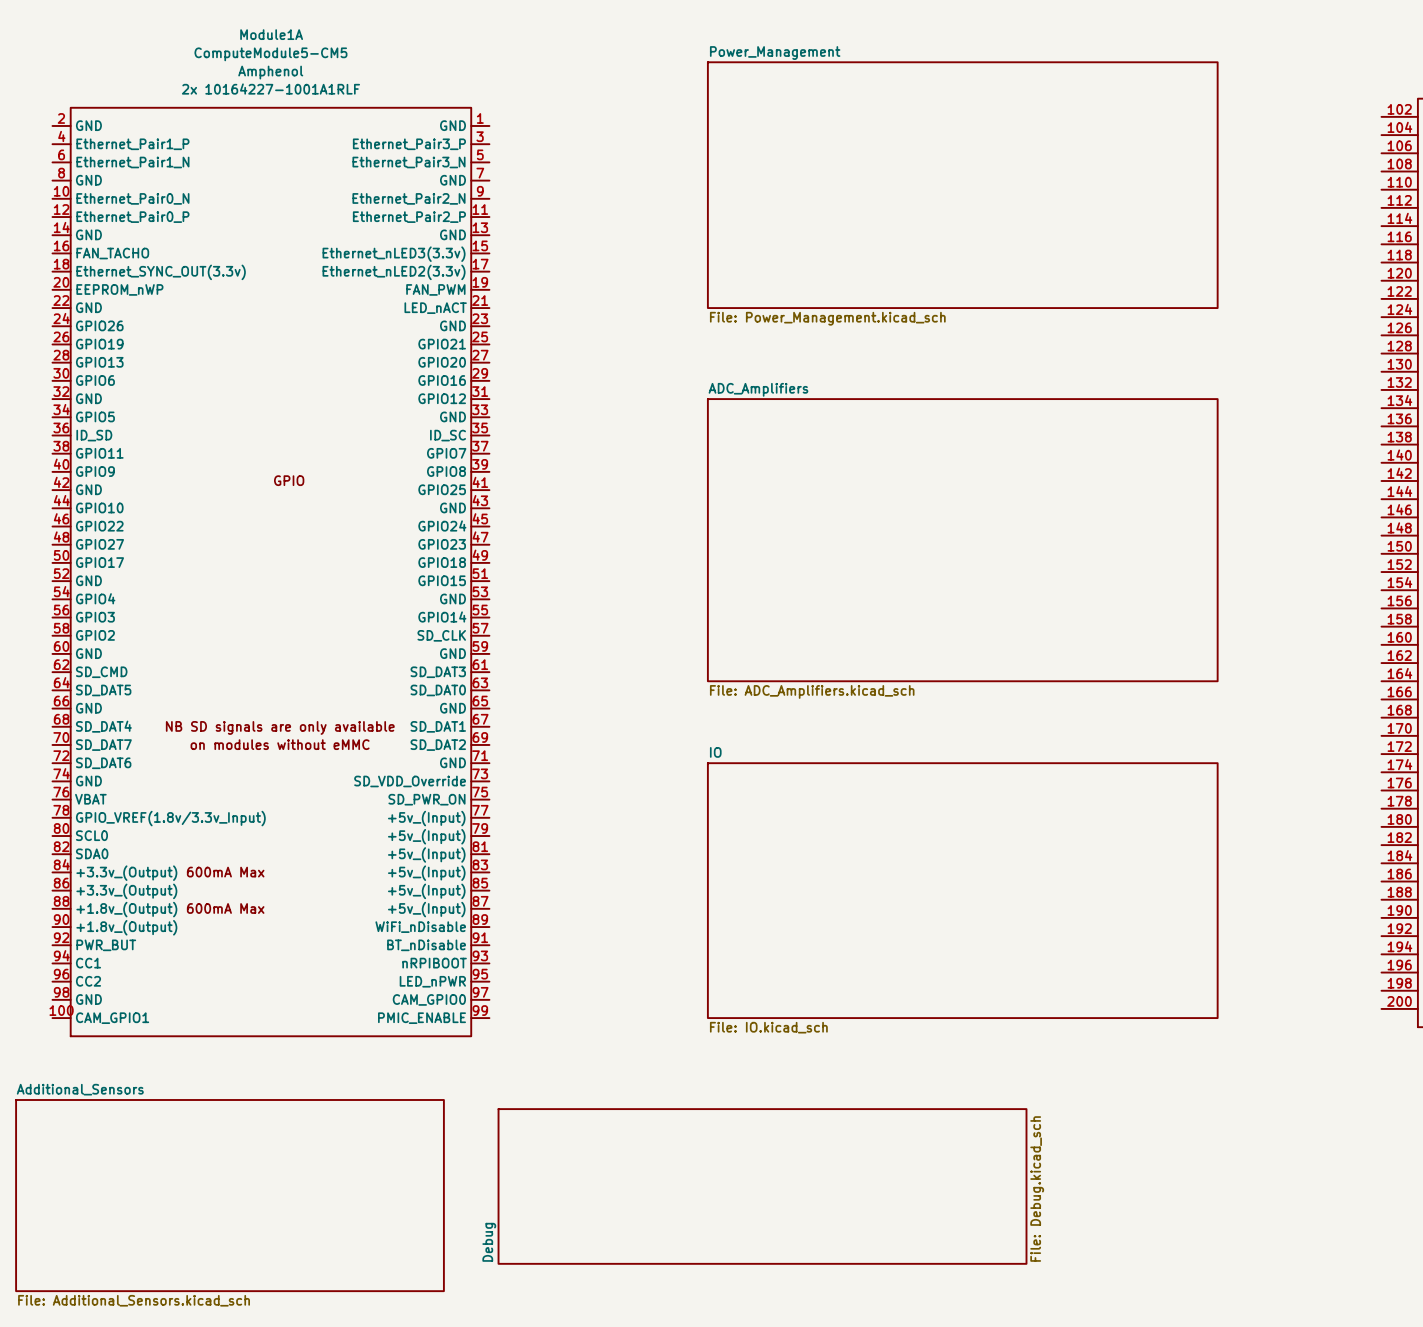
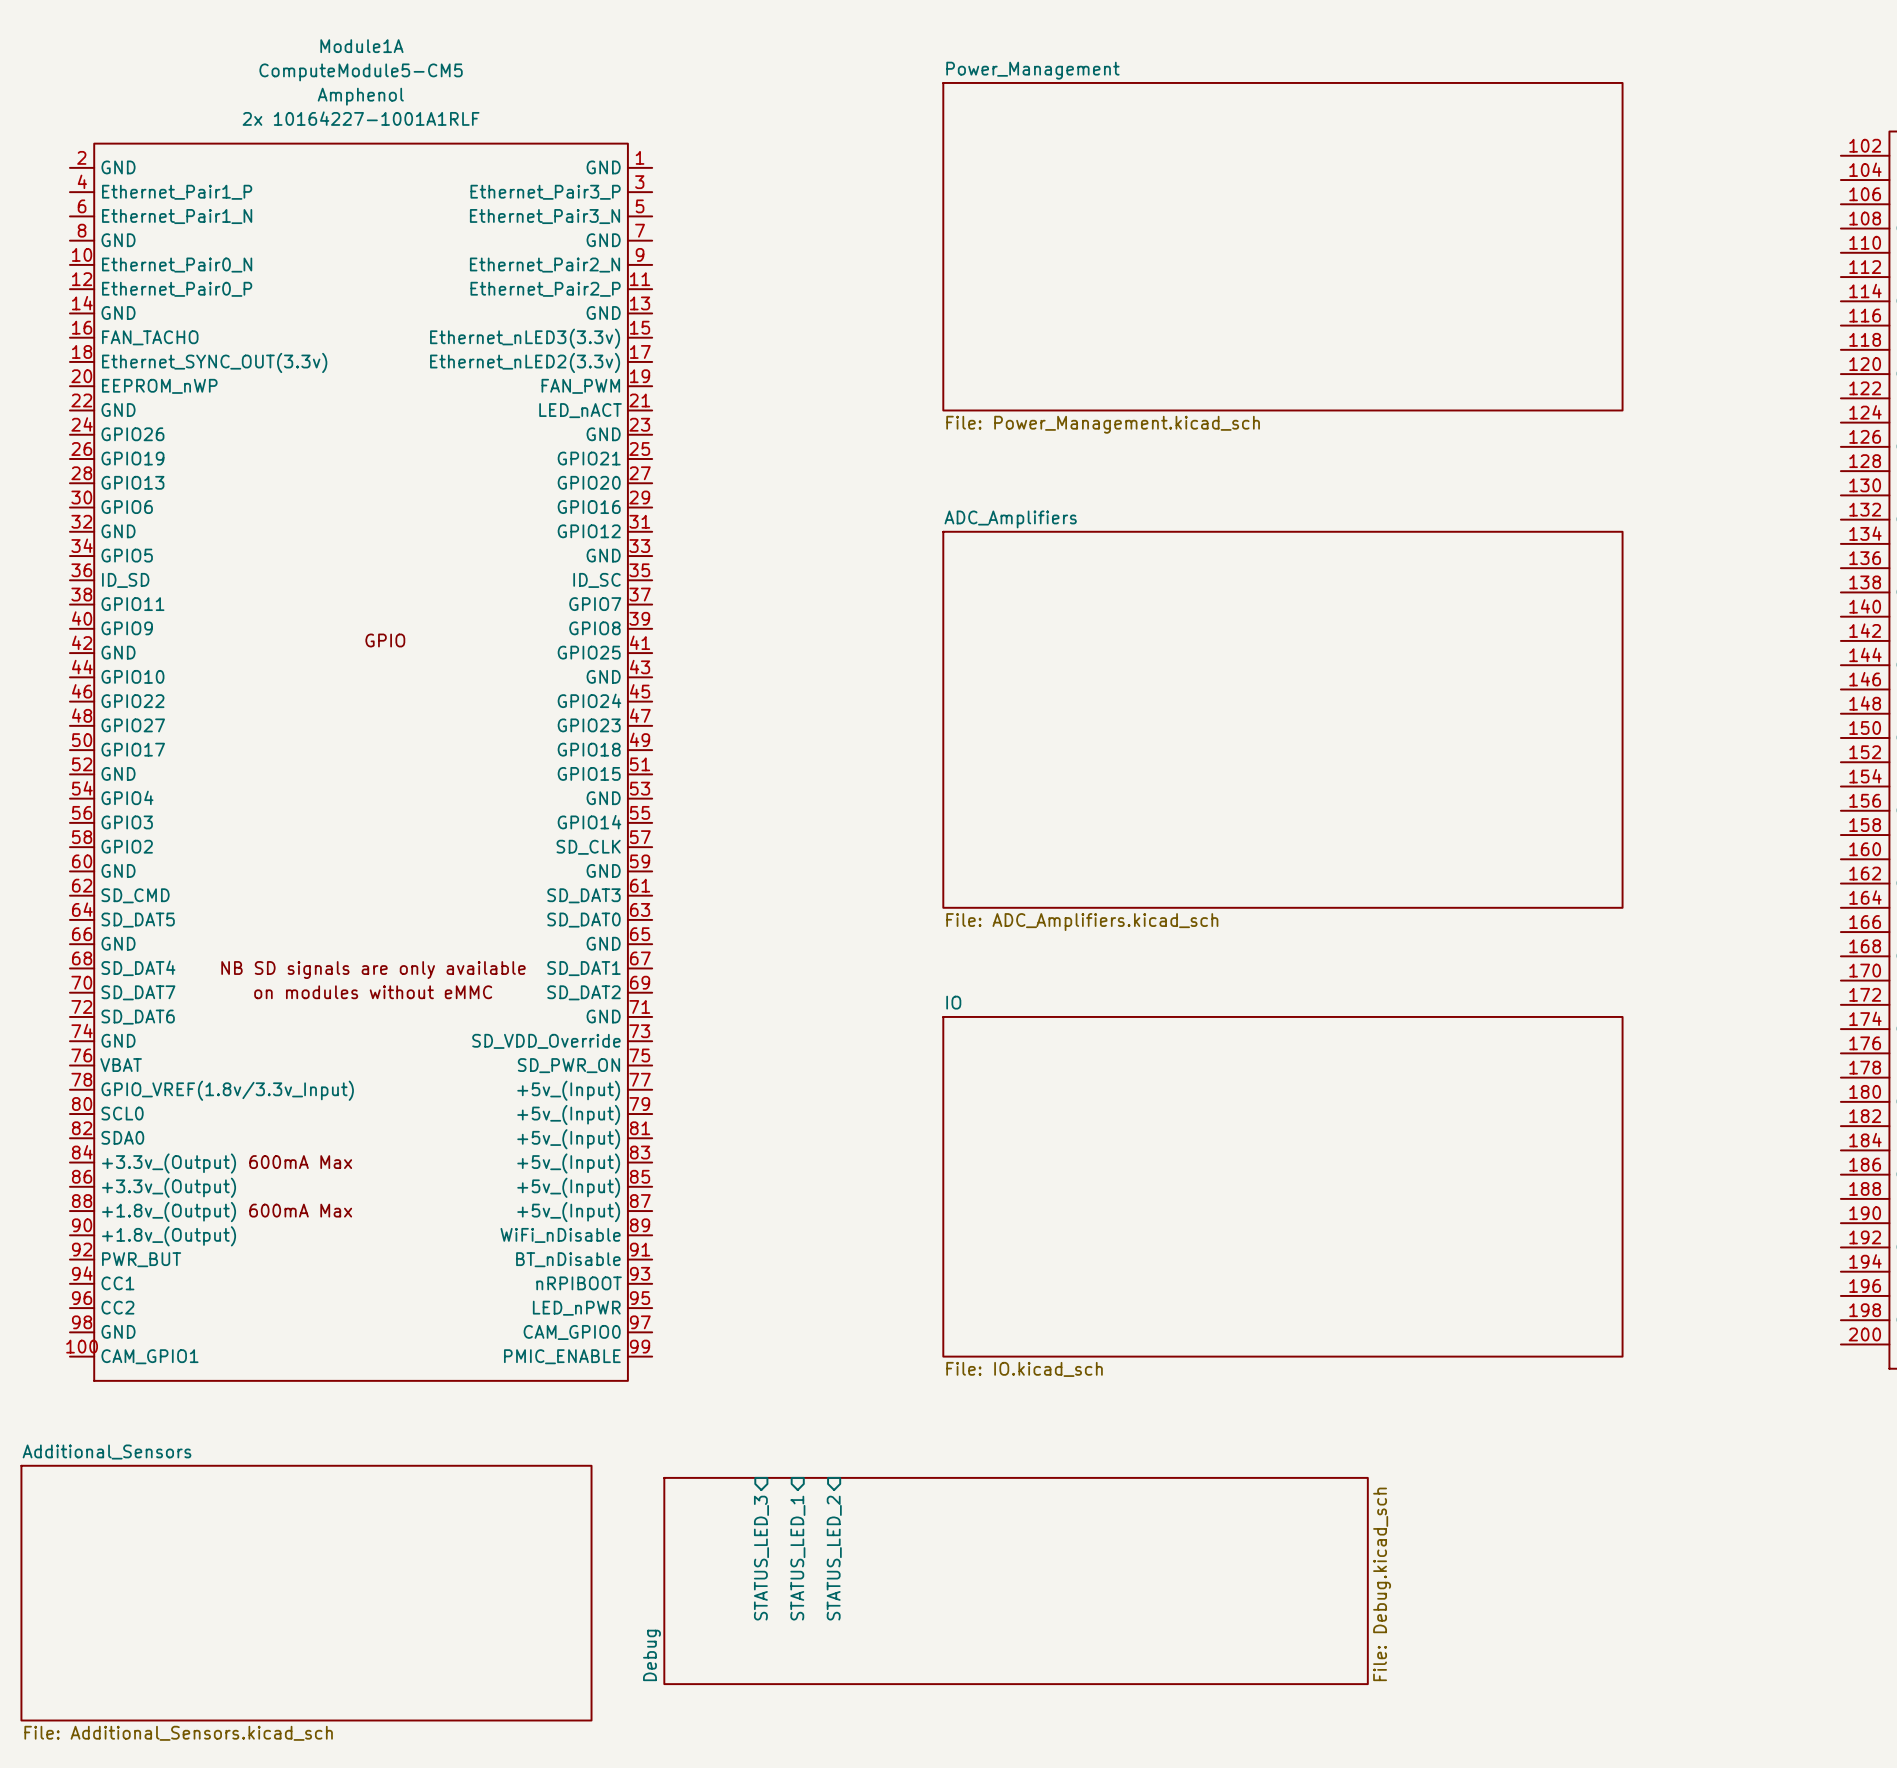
sheet pin: none -> STATUS_LED_3 (761, 1558)
sheet pin: none -> STATUS_LED_1 (797, 1558)
sheet pin: none -> STATUS_LED_2 (834, 1558)

